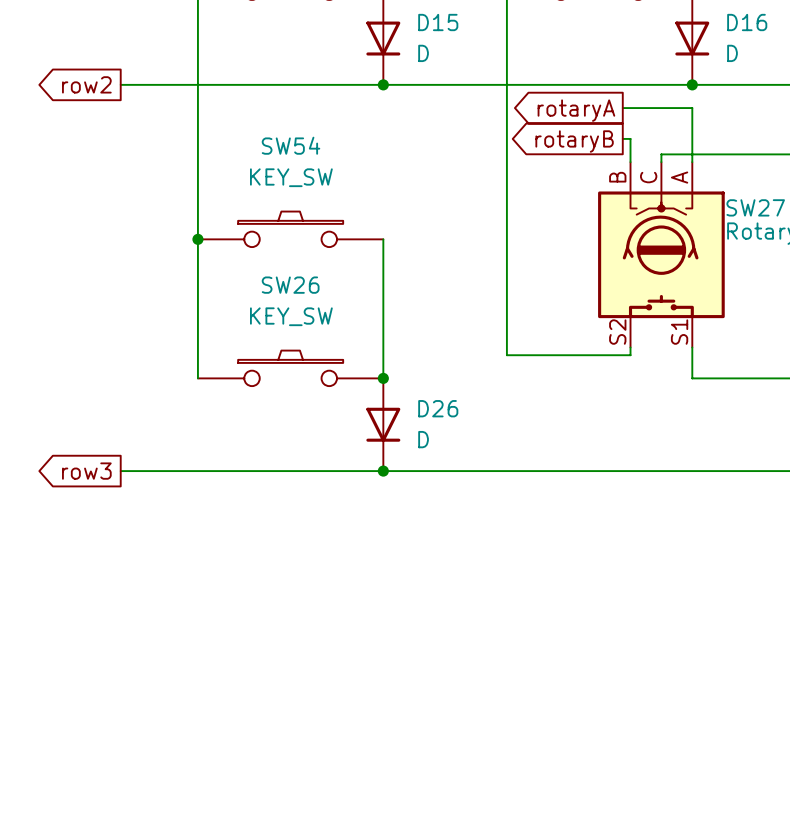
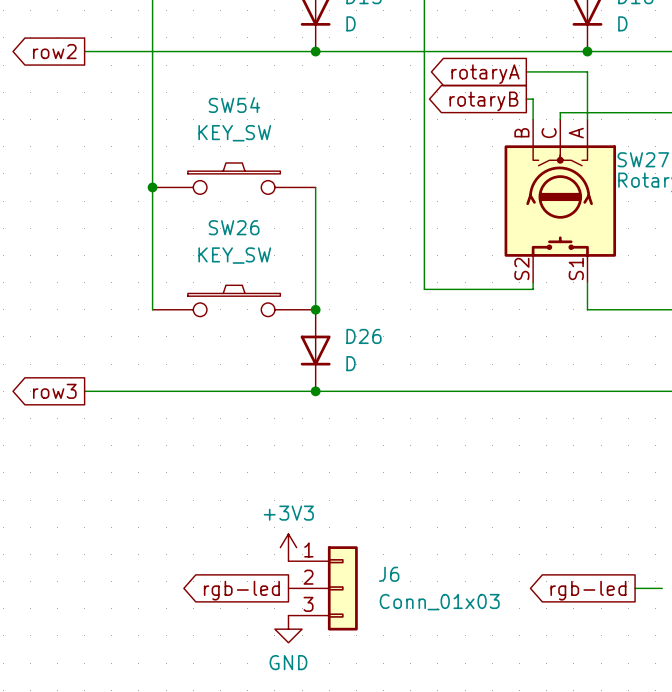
power symbol: none -> +3V3 (288, 547)
J6: none -> Conn_01x03 (323, 588)
wire: none -> (635, 588) (662, 588)
global label: none -> rgb-led (241, 590)
global label: none -> rgb-led (588, 590)
power symbol: none -> GND (288, 629)

